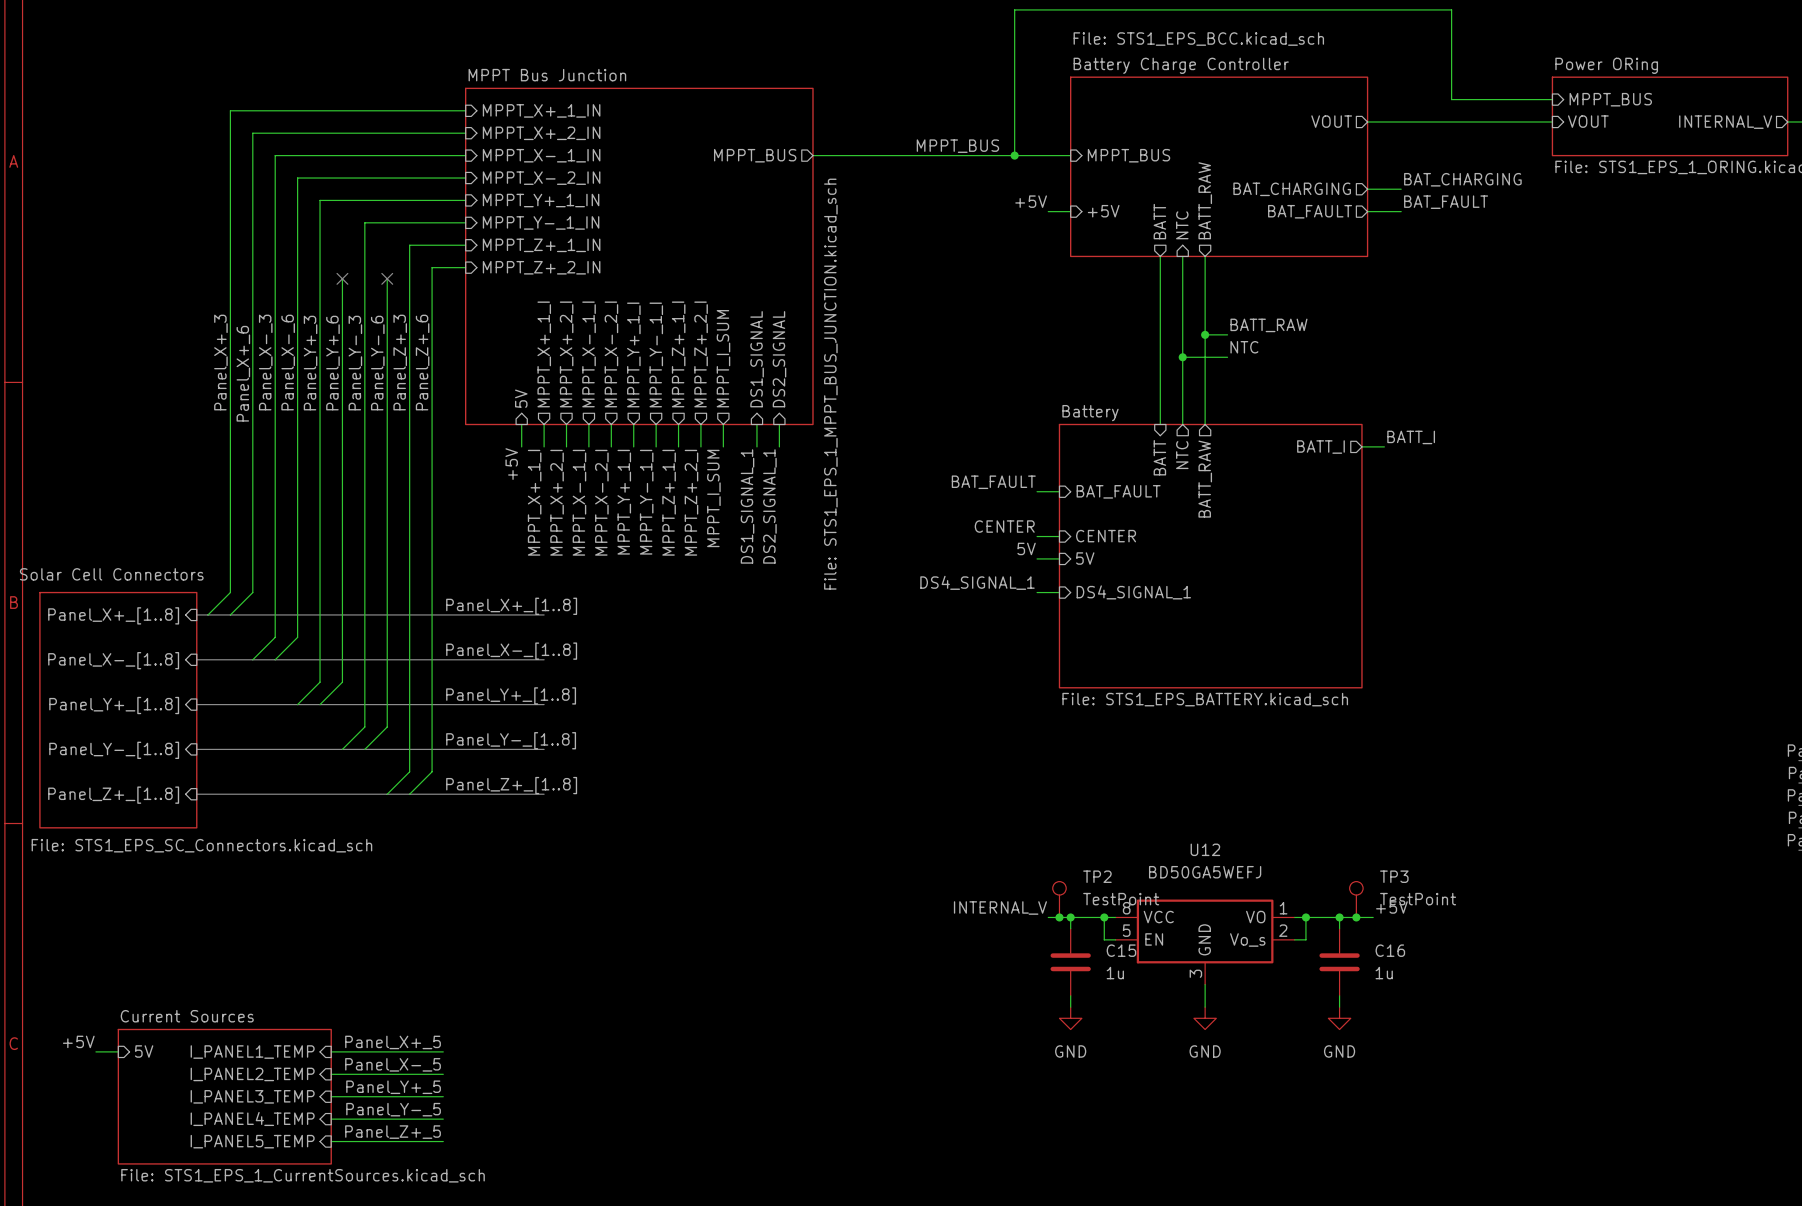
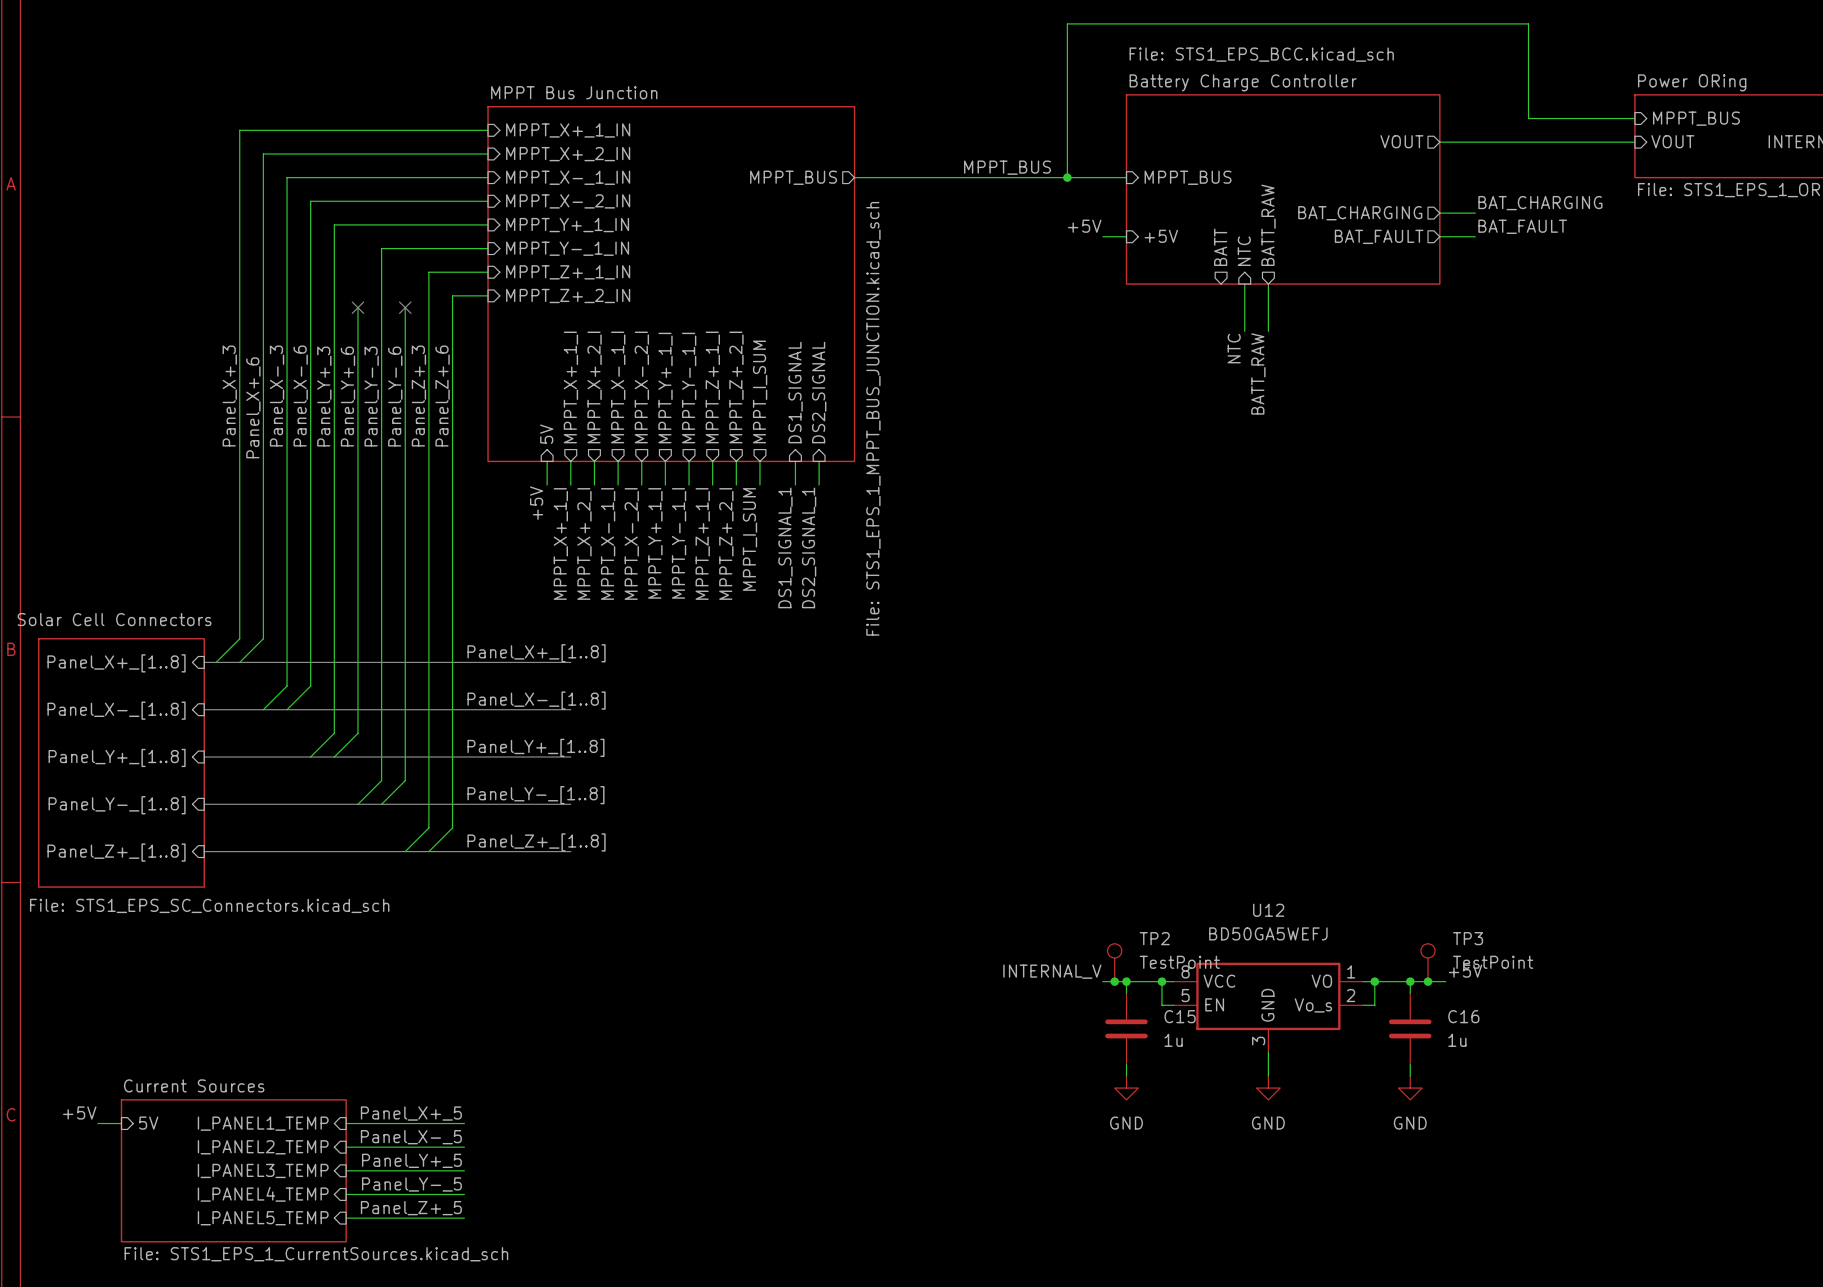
wire: (1160, 256) (1160, 424) -> none
wire: (1182, 301) (1182, 424) -> none
wire: (1205, 301) (1205, 424) -> none
label rotation: 0° (1268, 325) -> 90° counterclockwise (1258, 373)
wire: (1205, 334) (1227, 334) -> none
junction: (1205, 334) -> none
label rotation: 0° (1244, 347) -> 90° counterclockwise (1234, 348)
label position: NTC (1244, 347) -> NTC (1234, 348)
wire: (1182, 357) (1227, 357) -> none
junction: (1182, 357) -> none
label: BATT_I (1411, 437) -> none
wire: (1361, 446) (1384, 446) -> none
sheet pin: BATT_I (1320, 447) -> none
sheet pin: NTC (1182, 455) -> none
sheet pin: BATT (1159, 457) -> none
sheet pin: BATT_RAW (1205, 479) -> none
label: BAT_FAULT (993, 482) -> none
wire: (1037, 491) (1059, 491) -> none
sheet pin: BAT_FAULT (1118, 491) -> none
label: CENTER (1004, 526) -> none
wire: (1037, 536) (1059, 536) -> none
sheet pin: CENTER (1106, 536) -> none
label: 5V (1026, 548) -> none
sheet Battery: File: STS1_EPS_BATTERY.kicad_sch (1210, 556) -> none
wire: (1037, 558) (1059, 558) -> none
sheet pin: 5V (1085, 558) -> none
label: DS4_SIGNAL_1 (977, 582) -> none
wire: (1037, 592) (1059, 592) -> none
sheet pin: DS4_SIGNAL_1 (1133, 592) -> none

